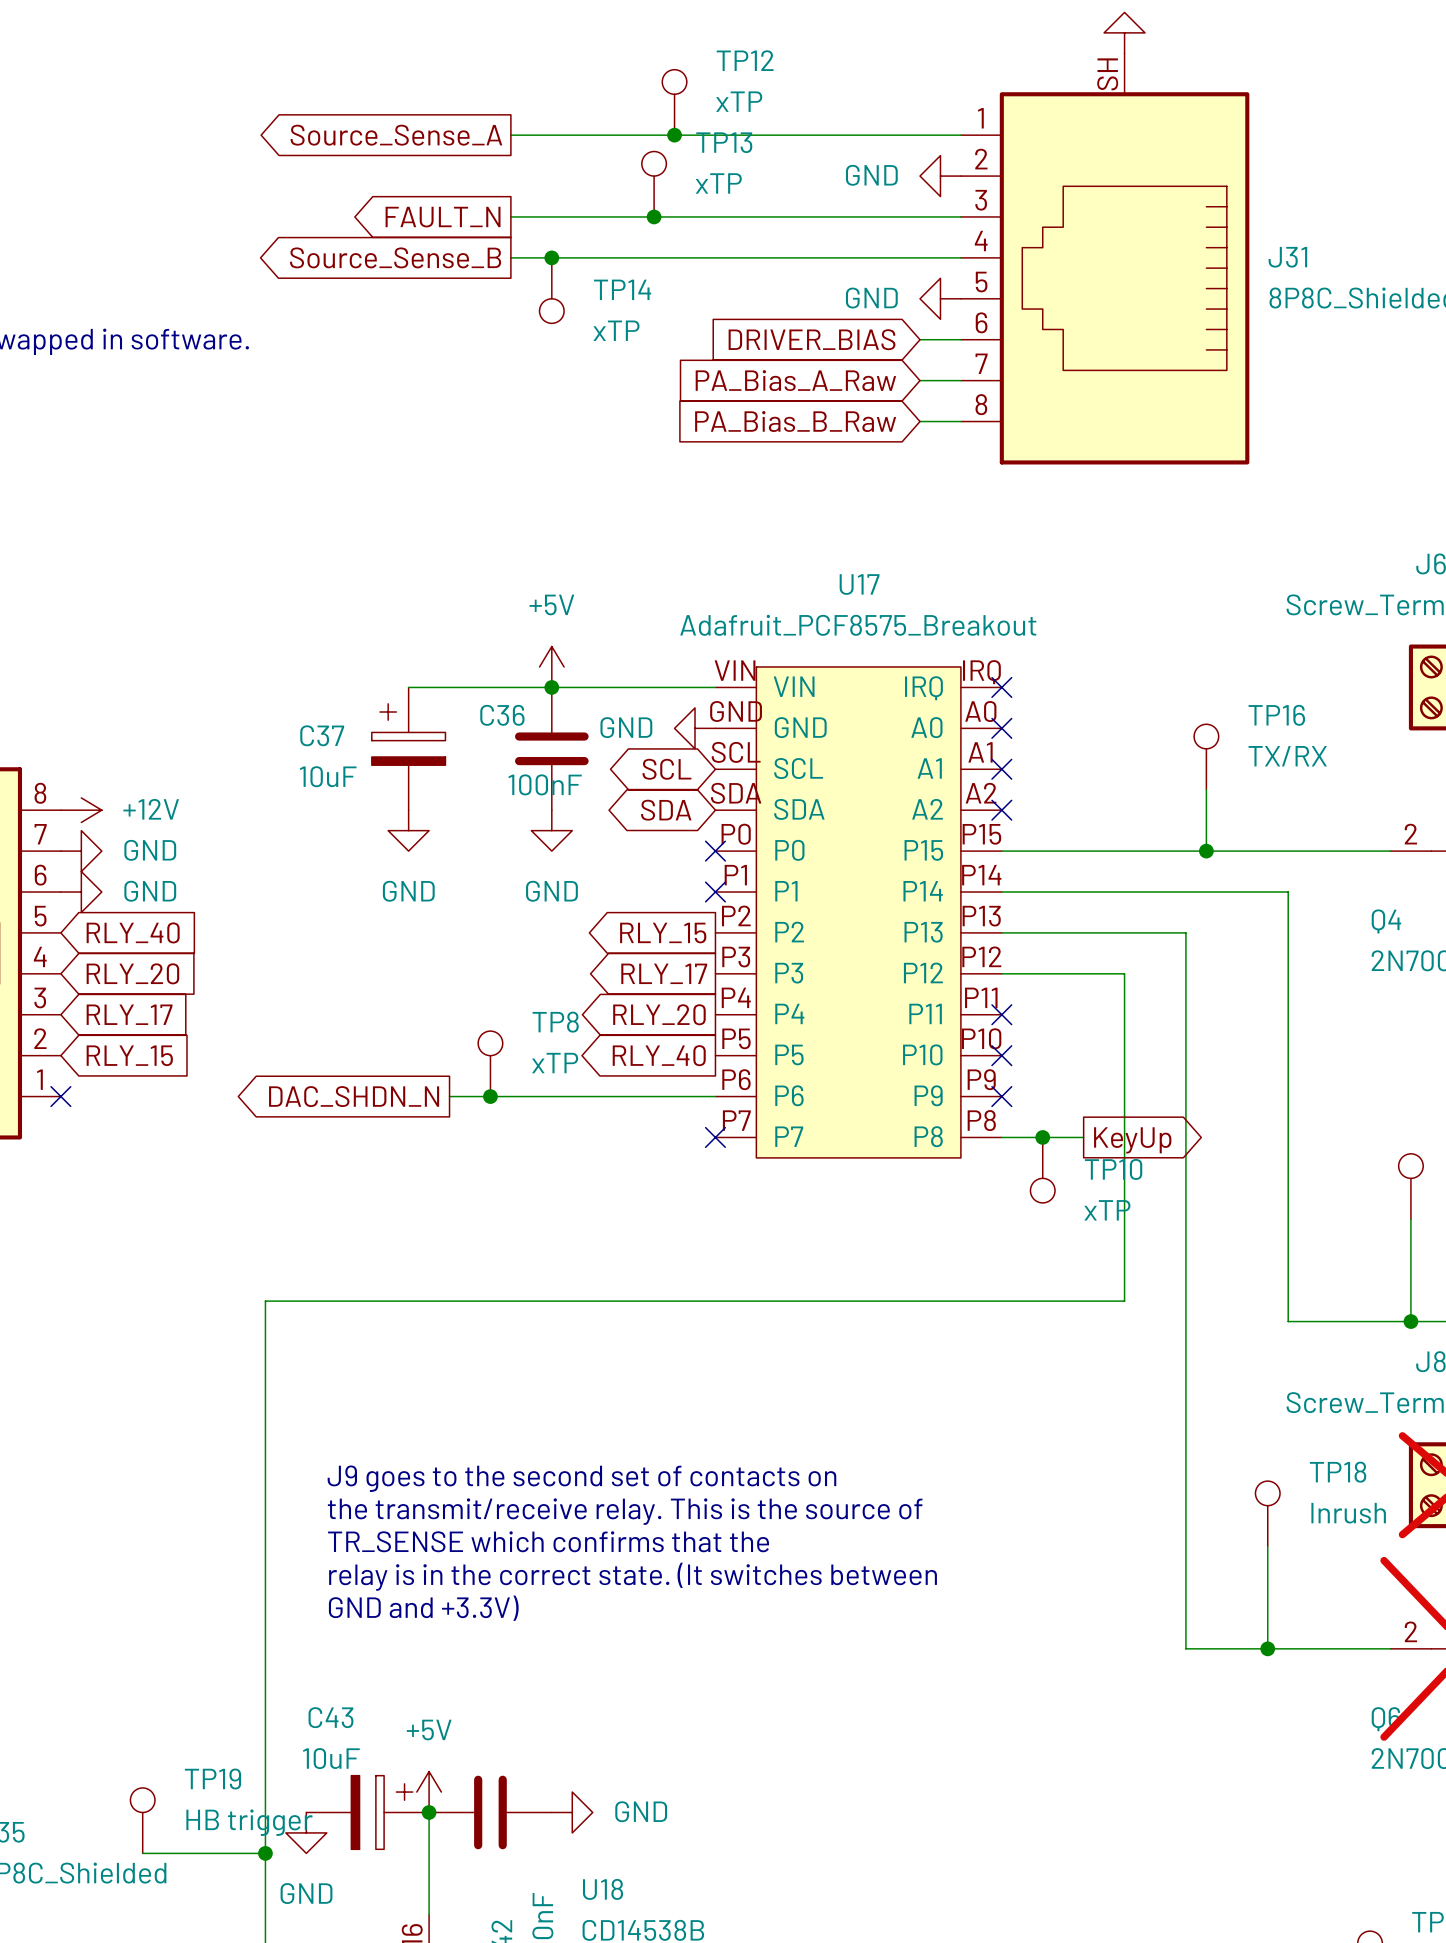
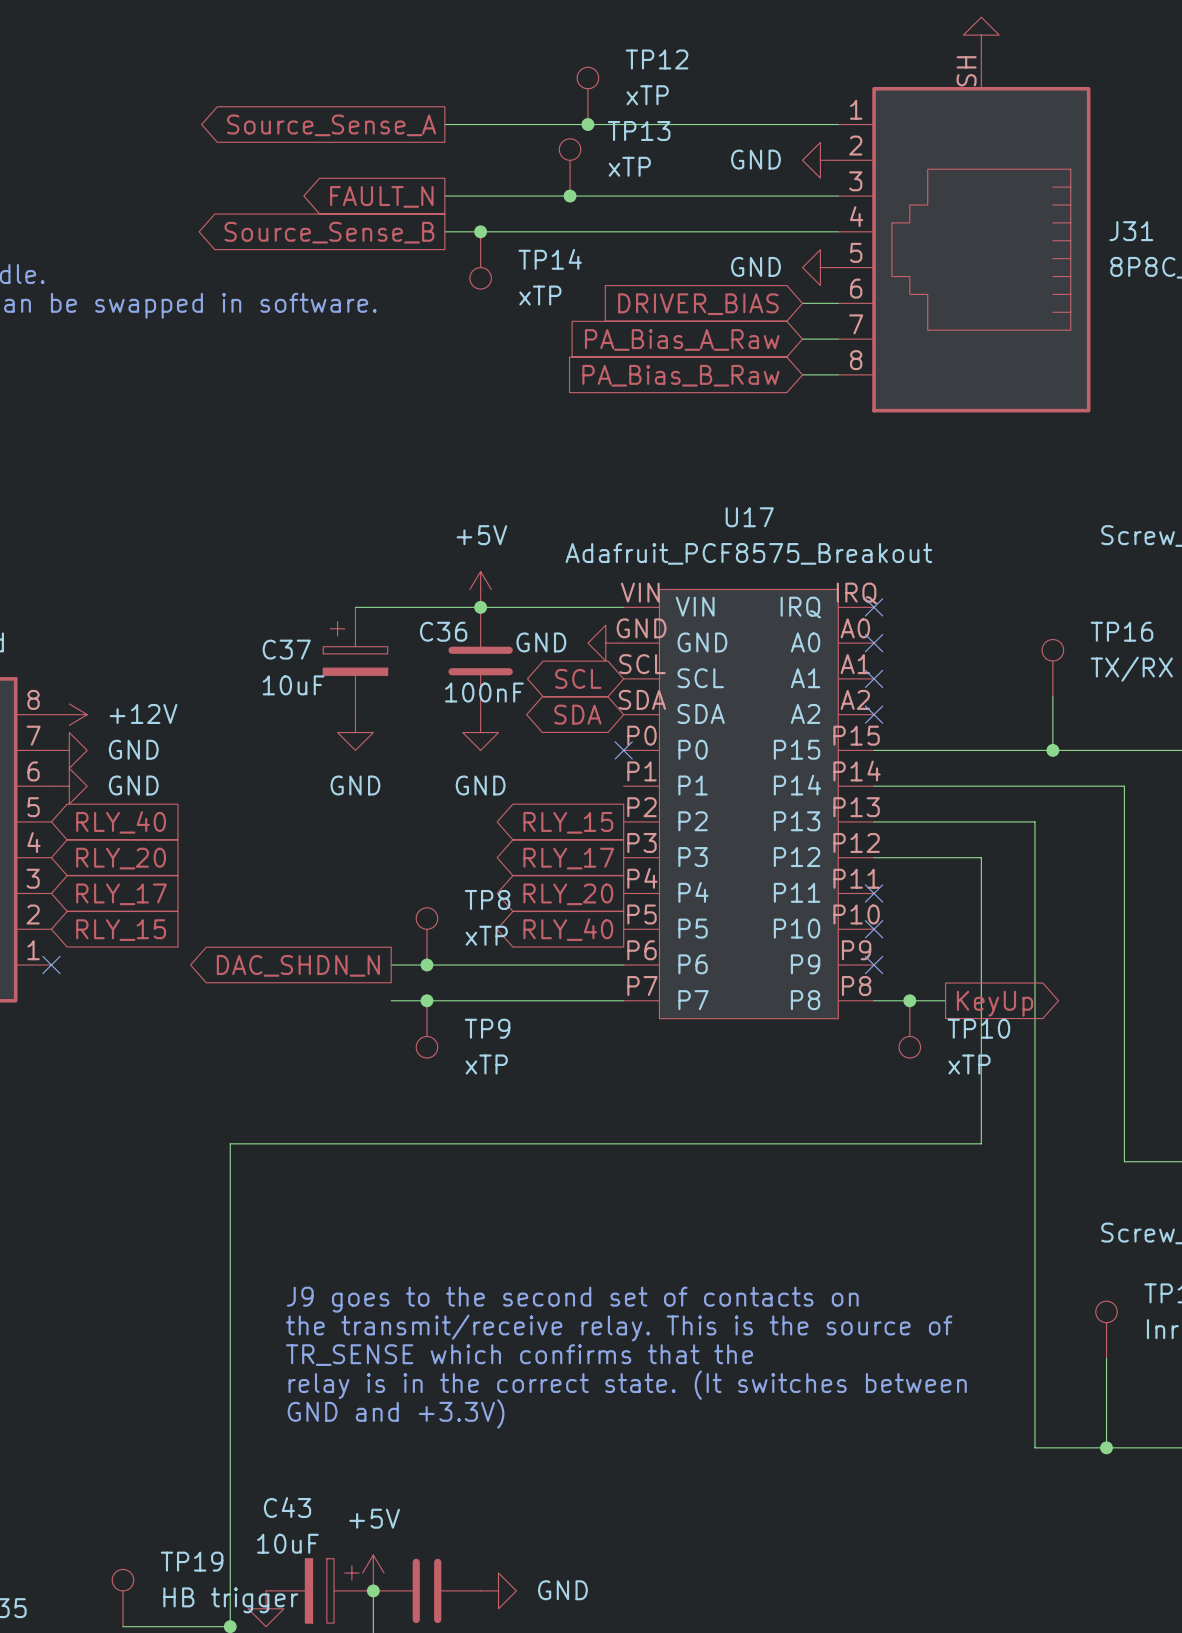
no-connect mark: (715, 892) -> none
wire: none -> (391, 1000) (623, 1000)
junction: none -> (426, 1000)
no-connect mark: (715, 1137) -> none
TP9: none -> xTP (426, 1029)

